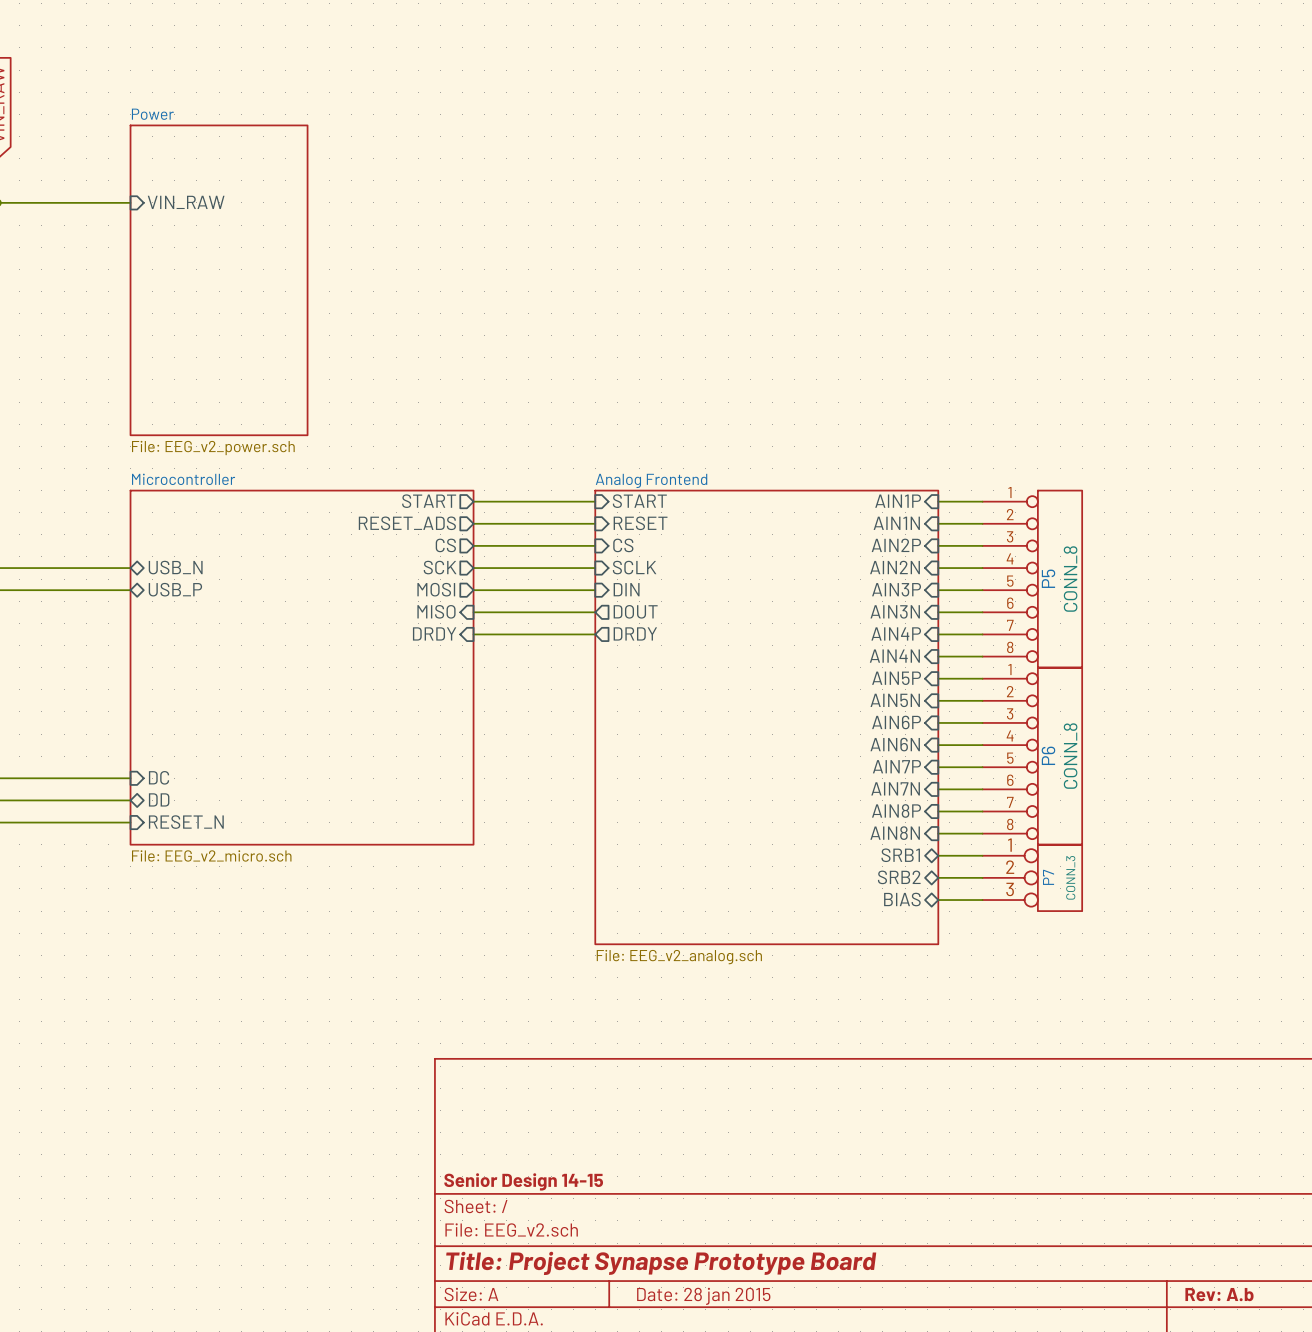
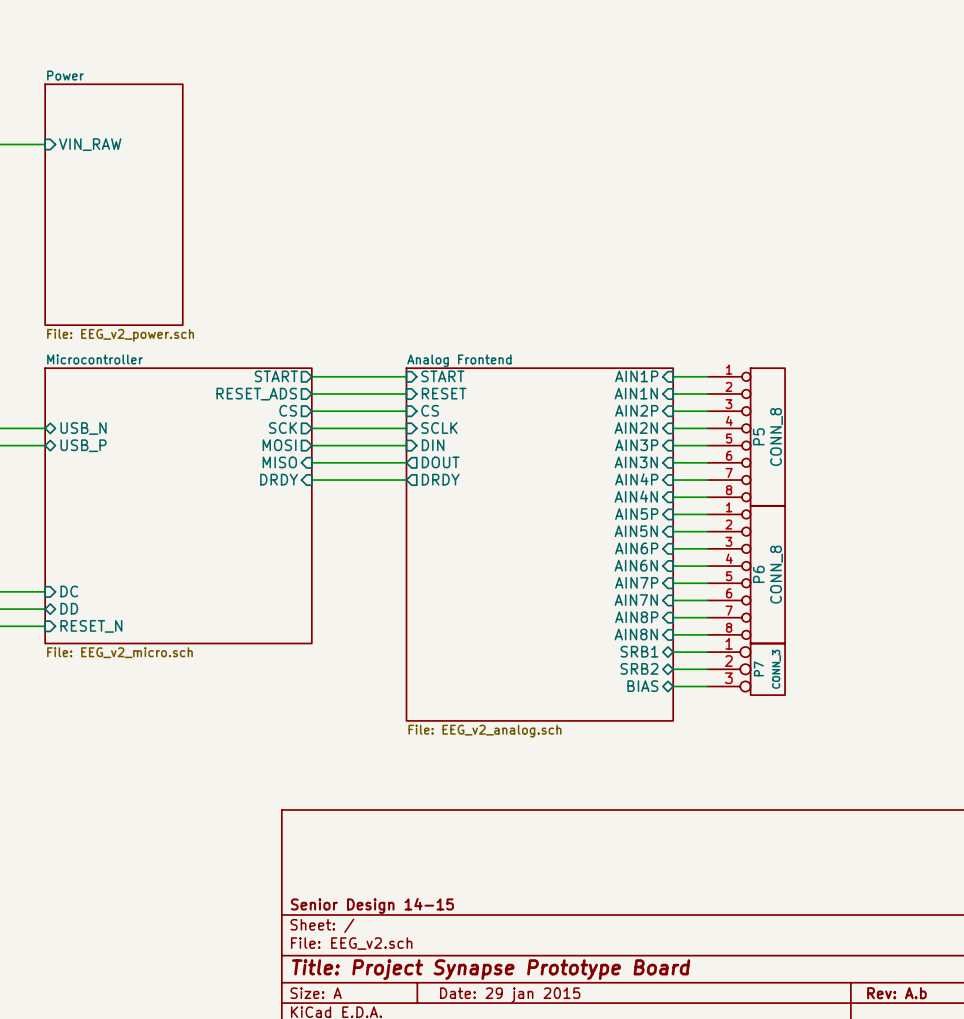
title block: Date: 28 jan 2015 (703, 1296) -> Date: 29 jan 2015 (510, 994)

